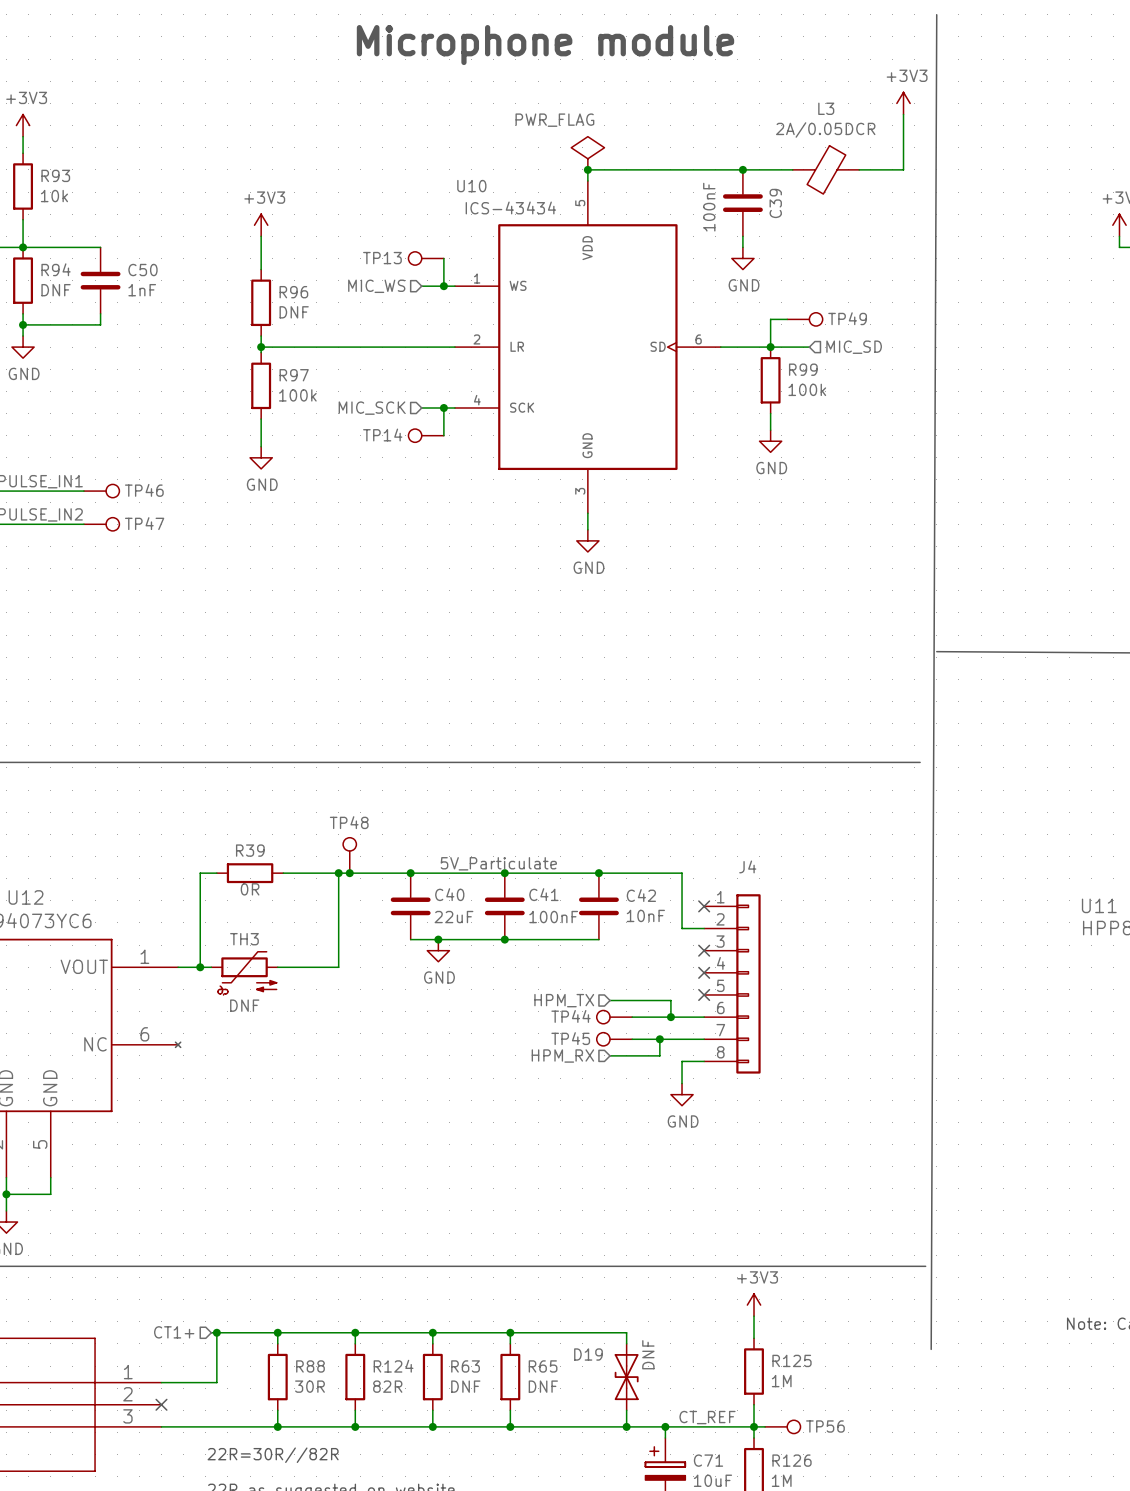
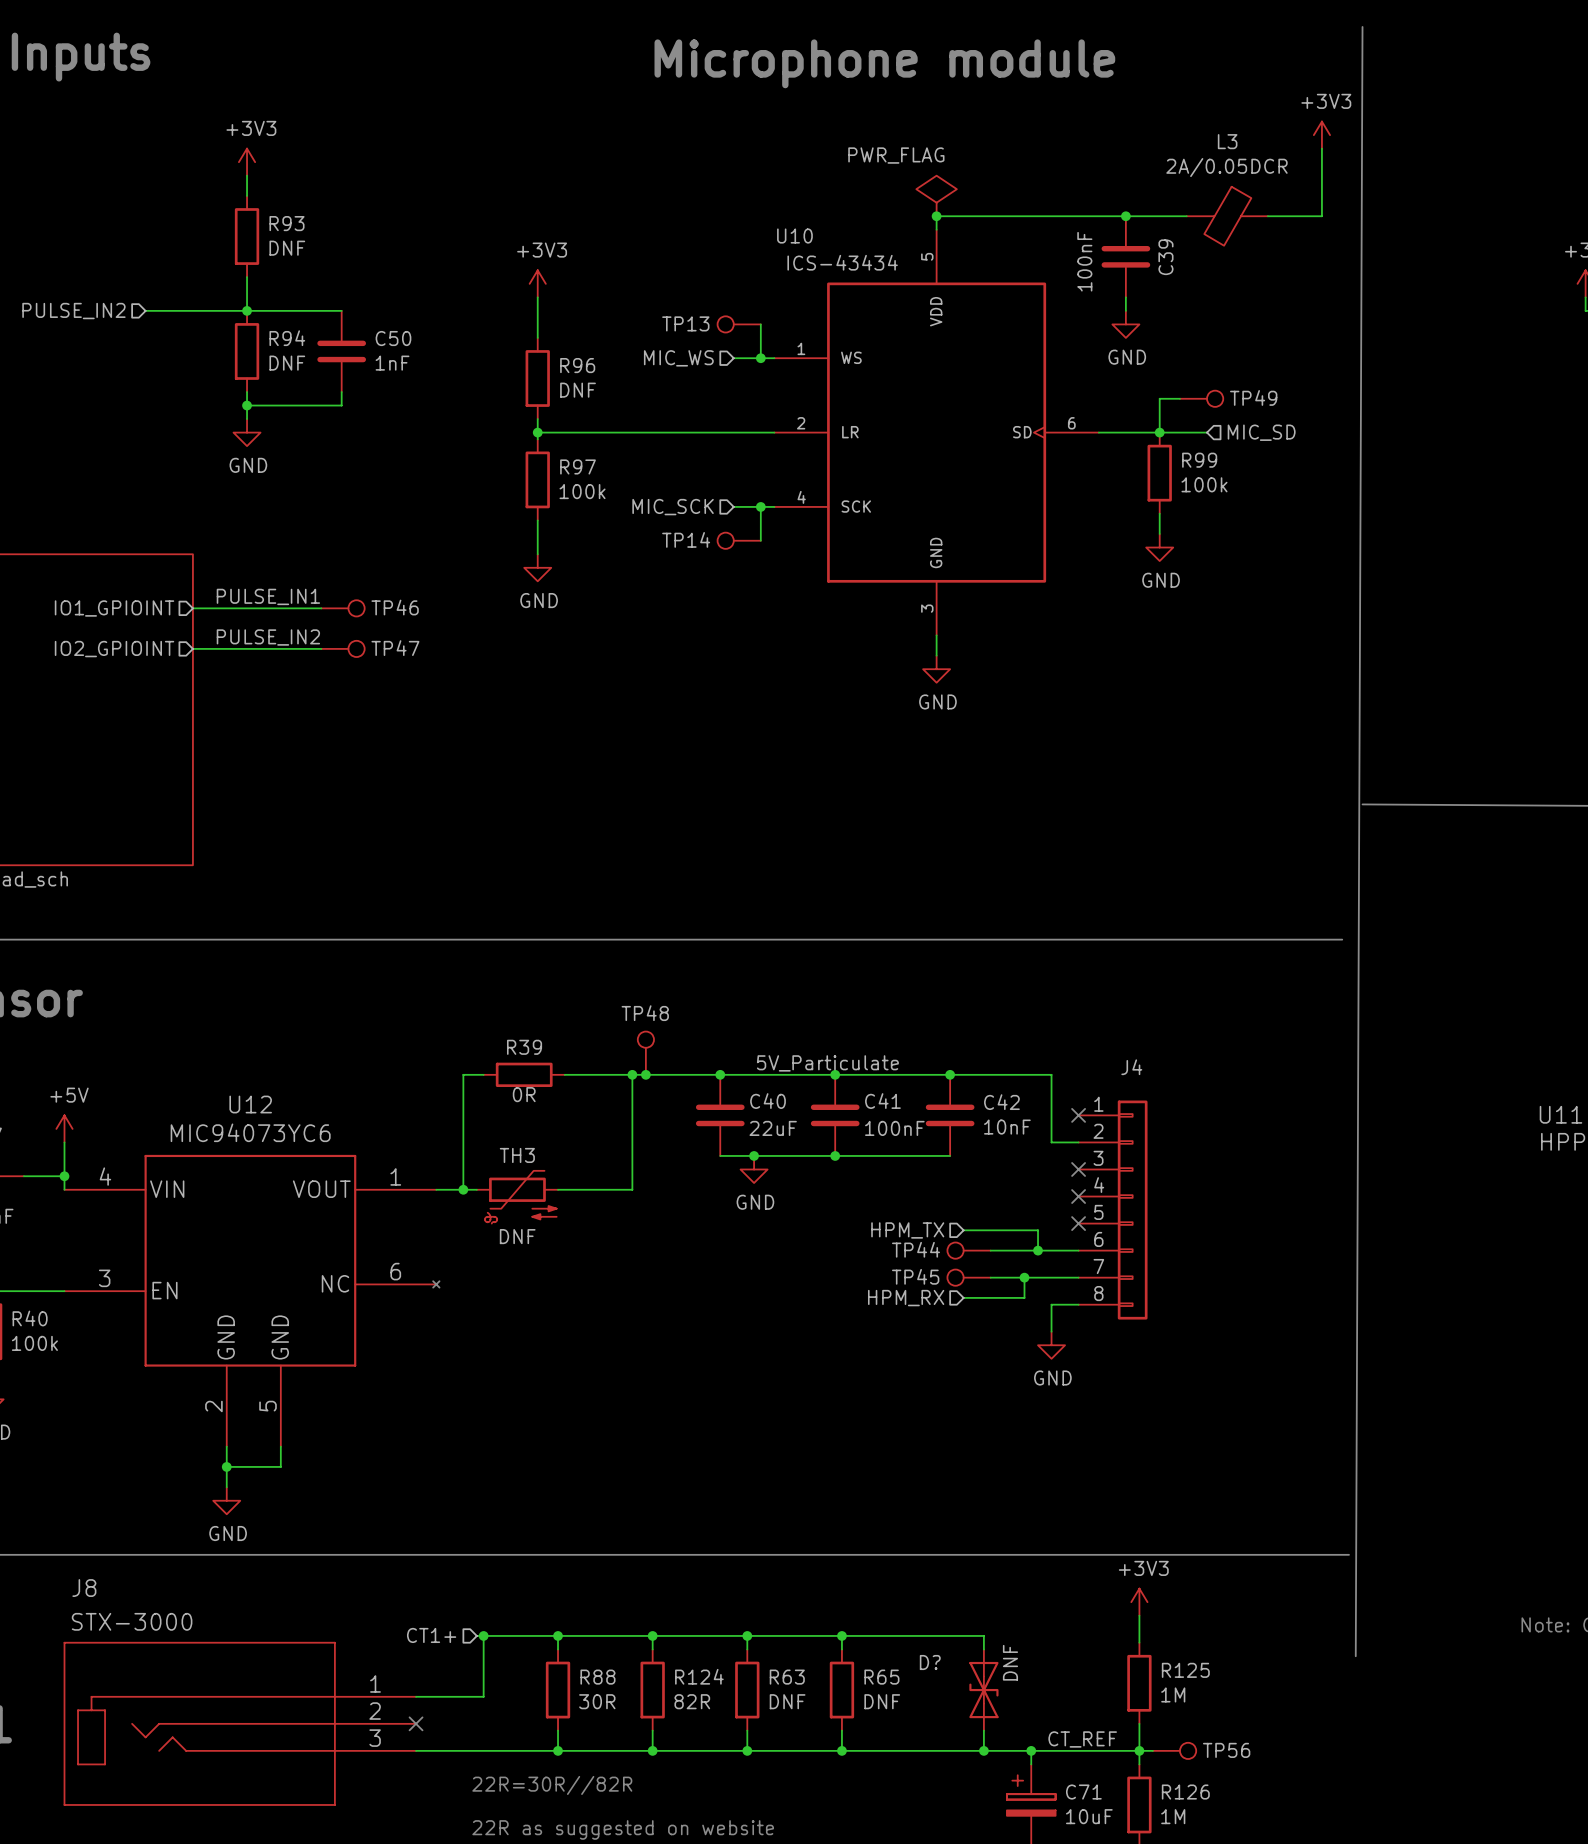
R93 value: 10k (54, 196) -> DNF (287, 248)
D19 name: D19 (588, 1354) -> D? (930, 1662)

